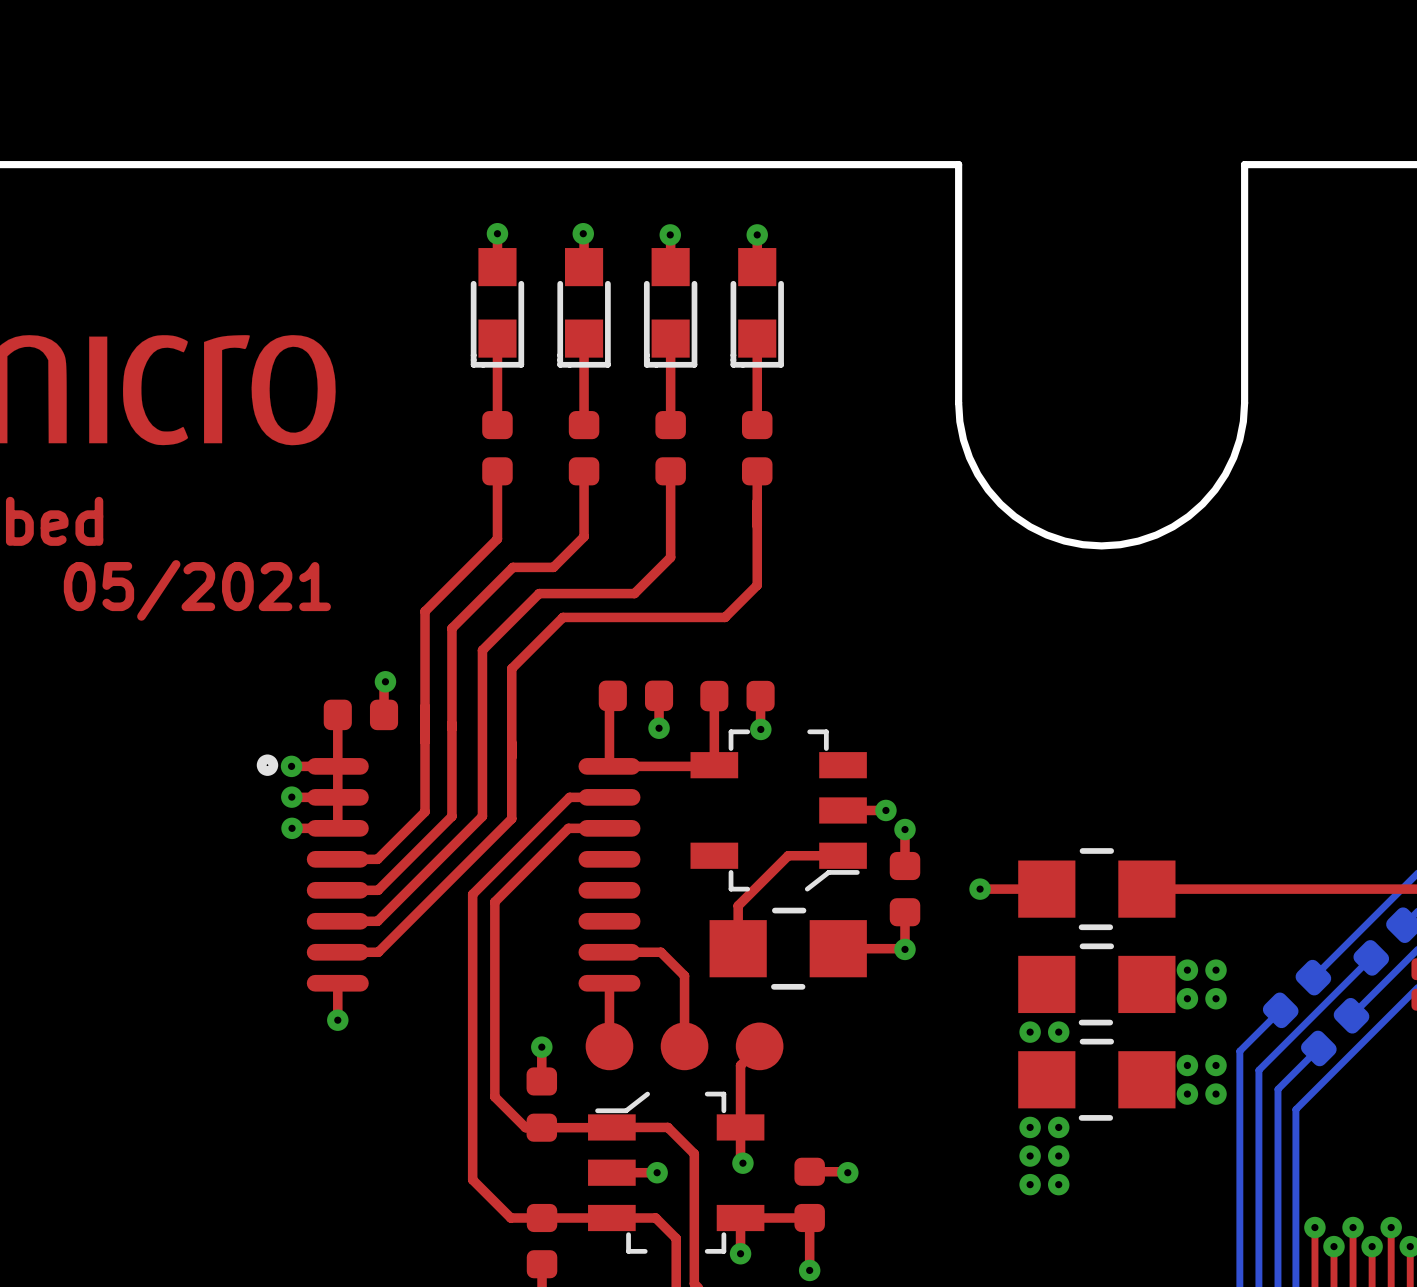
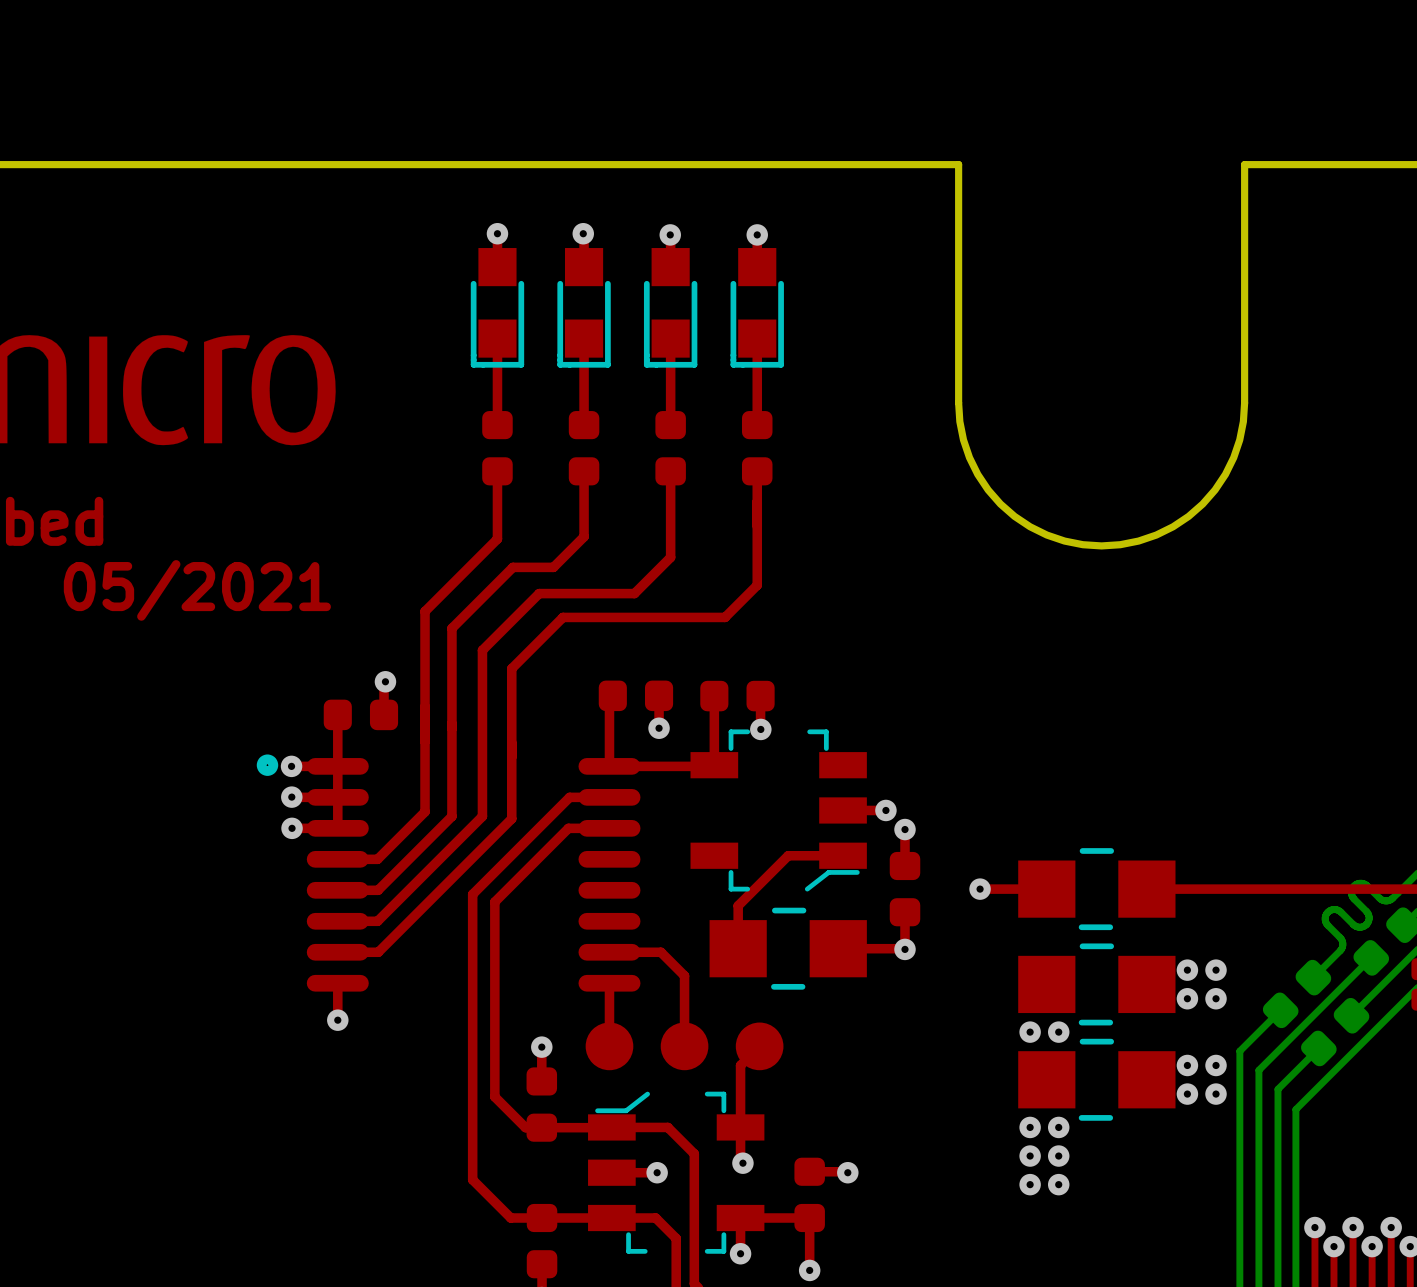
bottom track: (1392, 898) (1340, 950) -> (1392, 898) (1383, 900) (1365, 884) (1359, 883) (1354, 885) (1351, 895) (1367, 913) (1369, 919) (1364, 925) (1358, 927) (1353, 924) (1339, 910) (1333, 909) (1327, 912) (1325, 921) (1341, 939) (1342, 945) (1340, 950)

